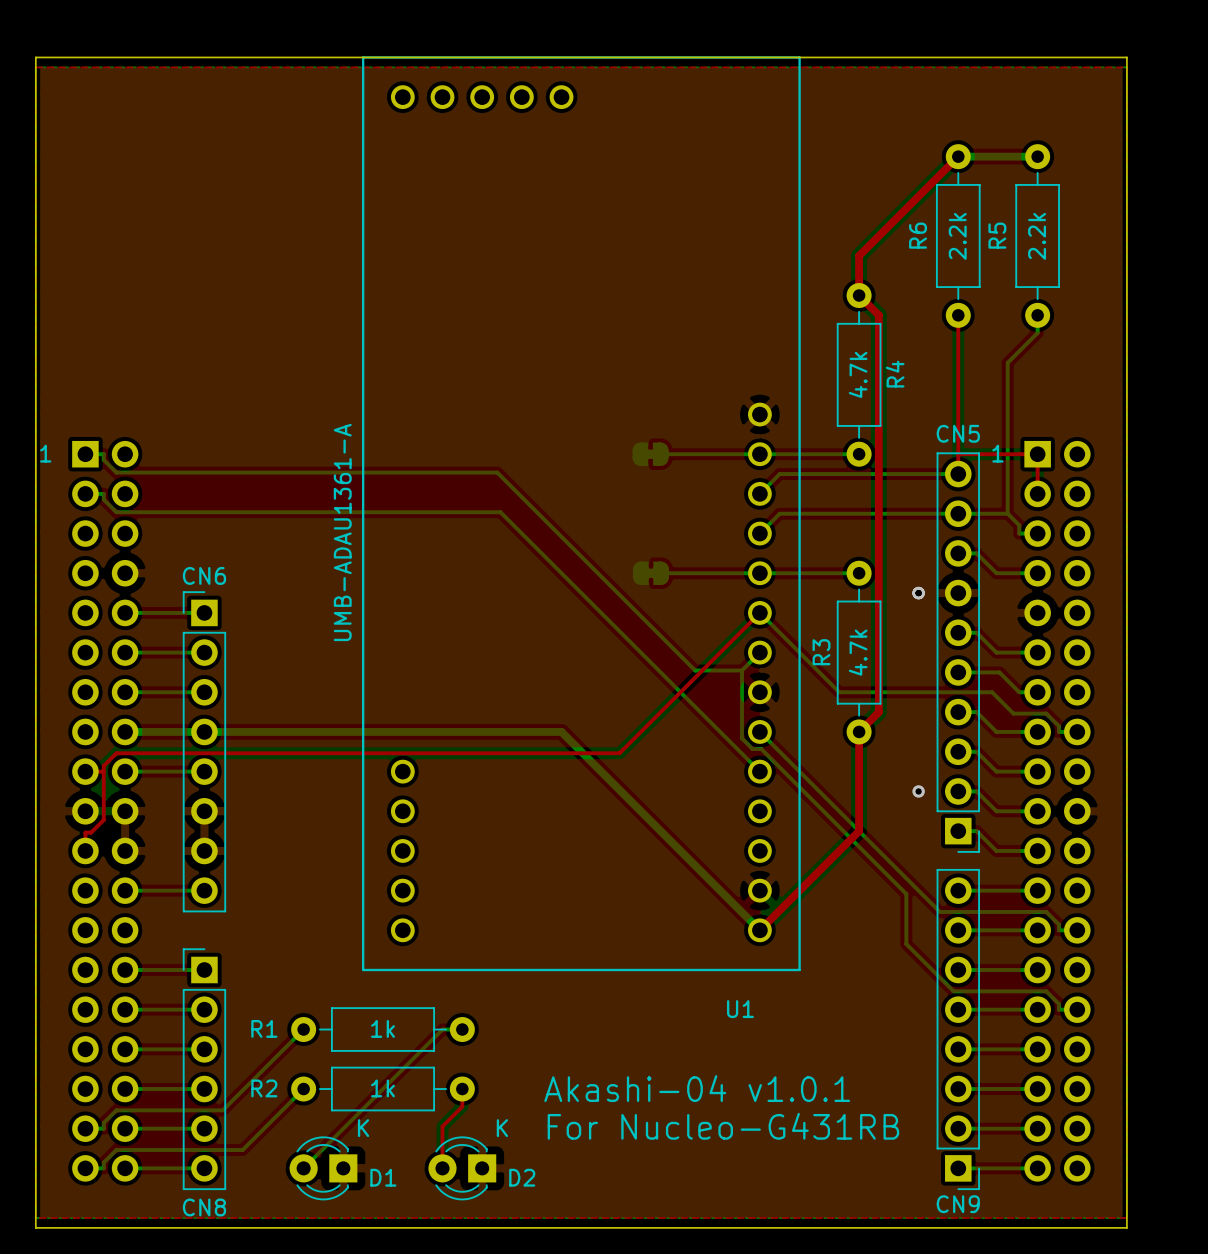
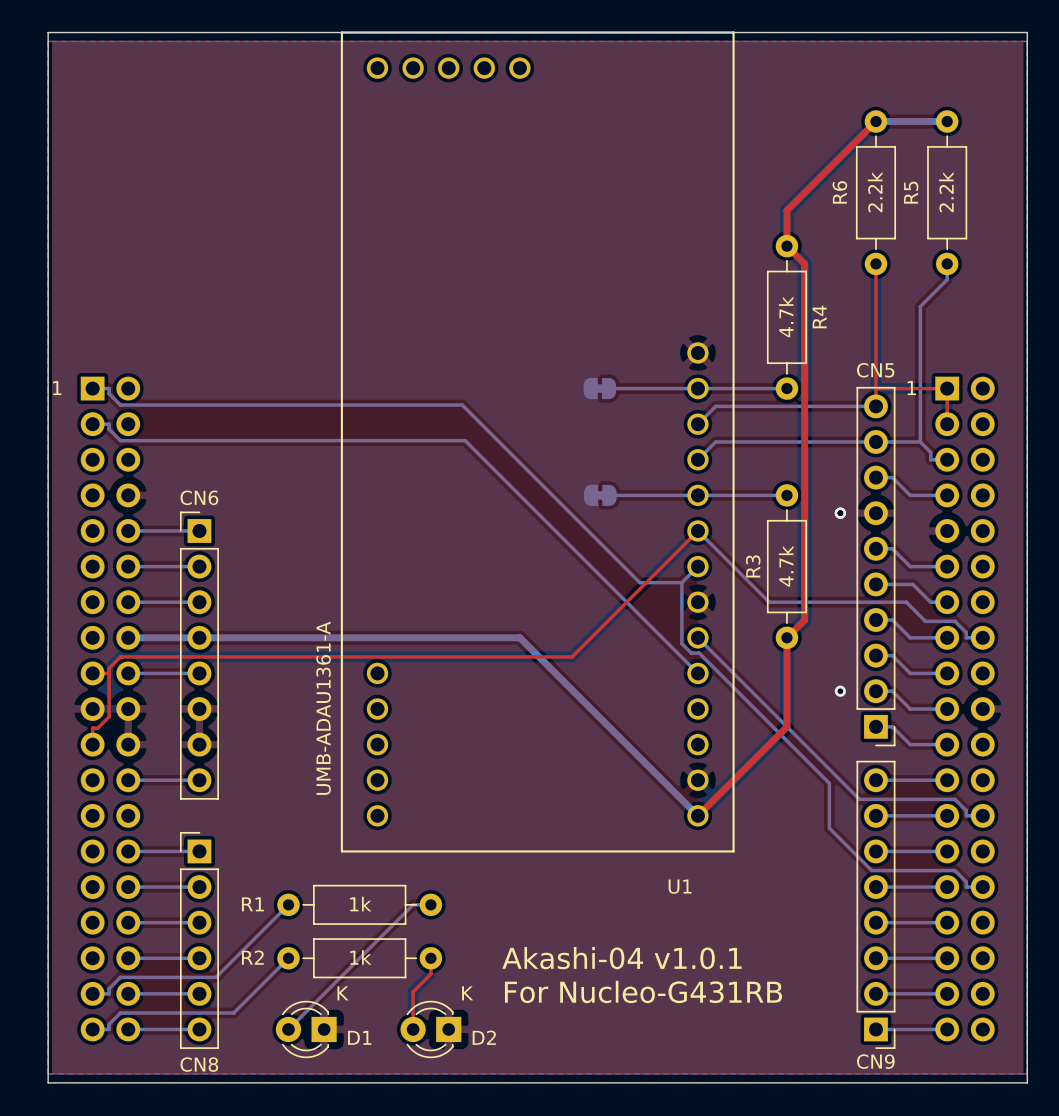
text position: UMB-ADAU1361-A (342, 532) -> UMB-ADAU1361-A (323, 708)

